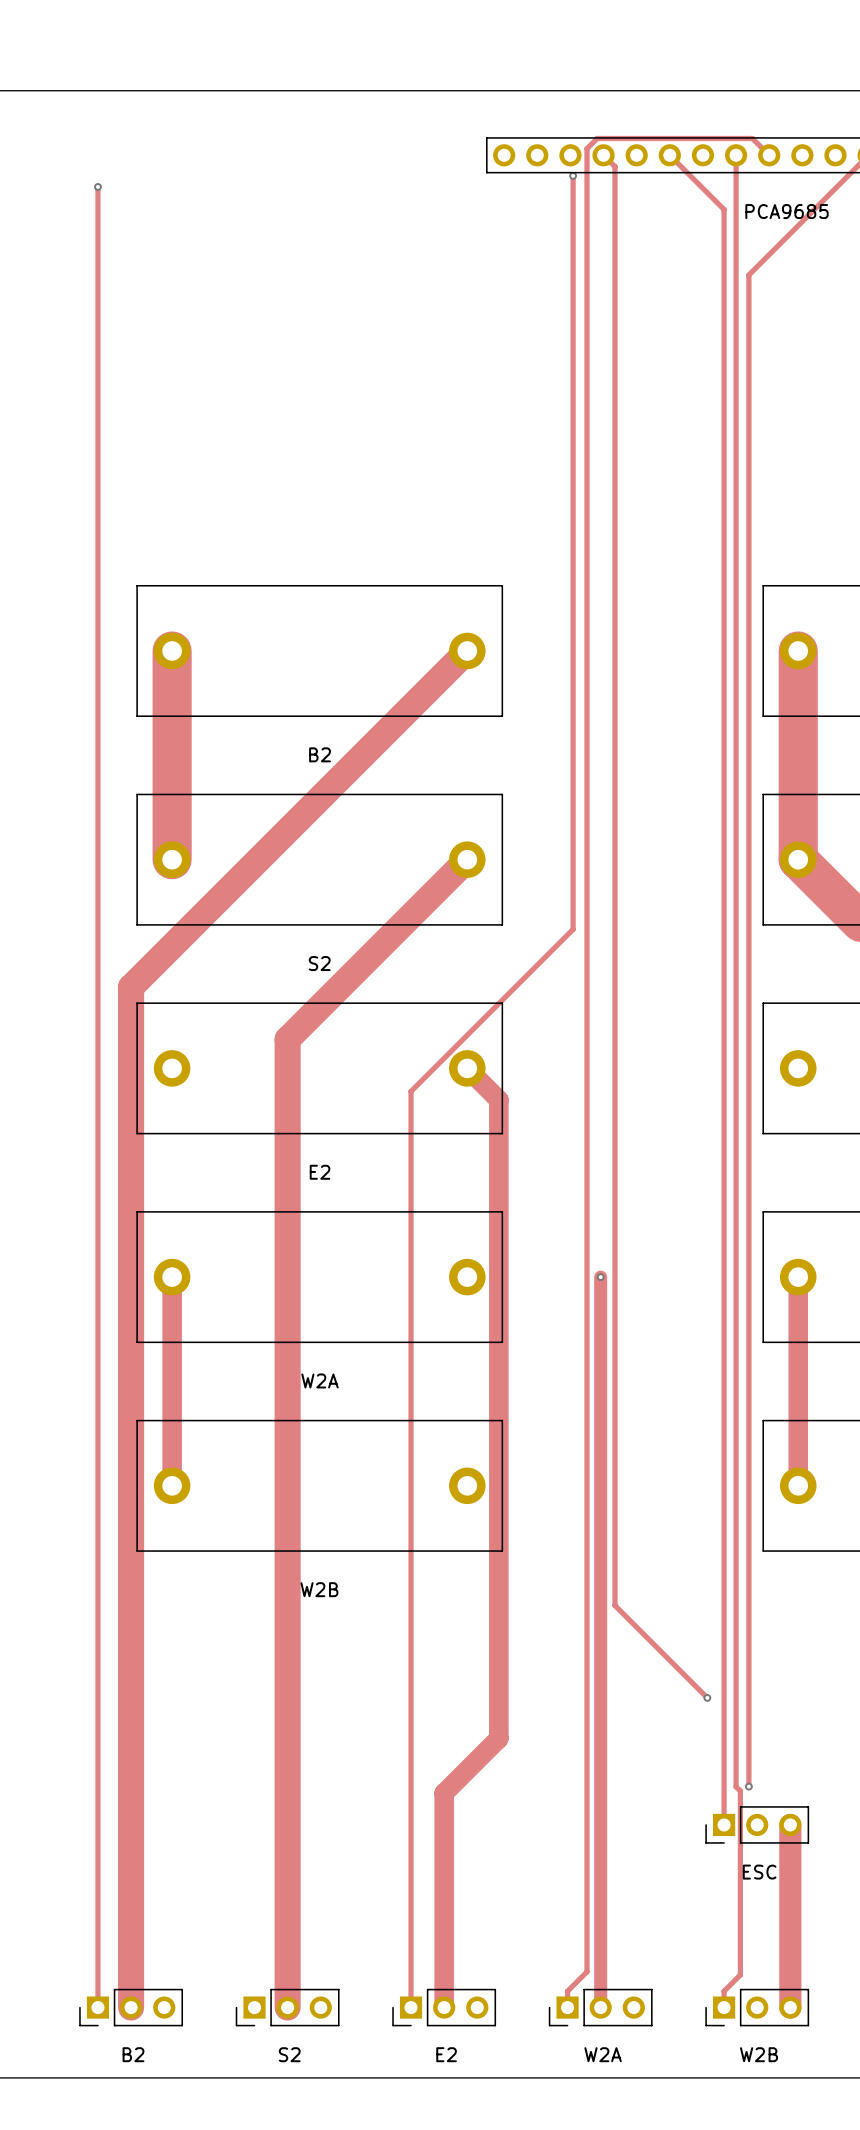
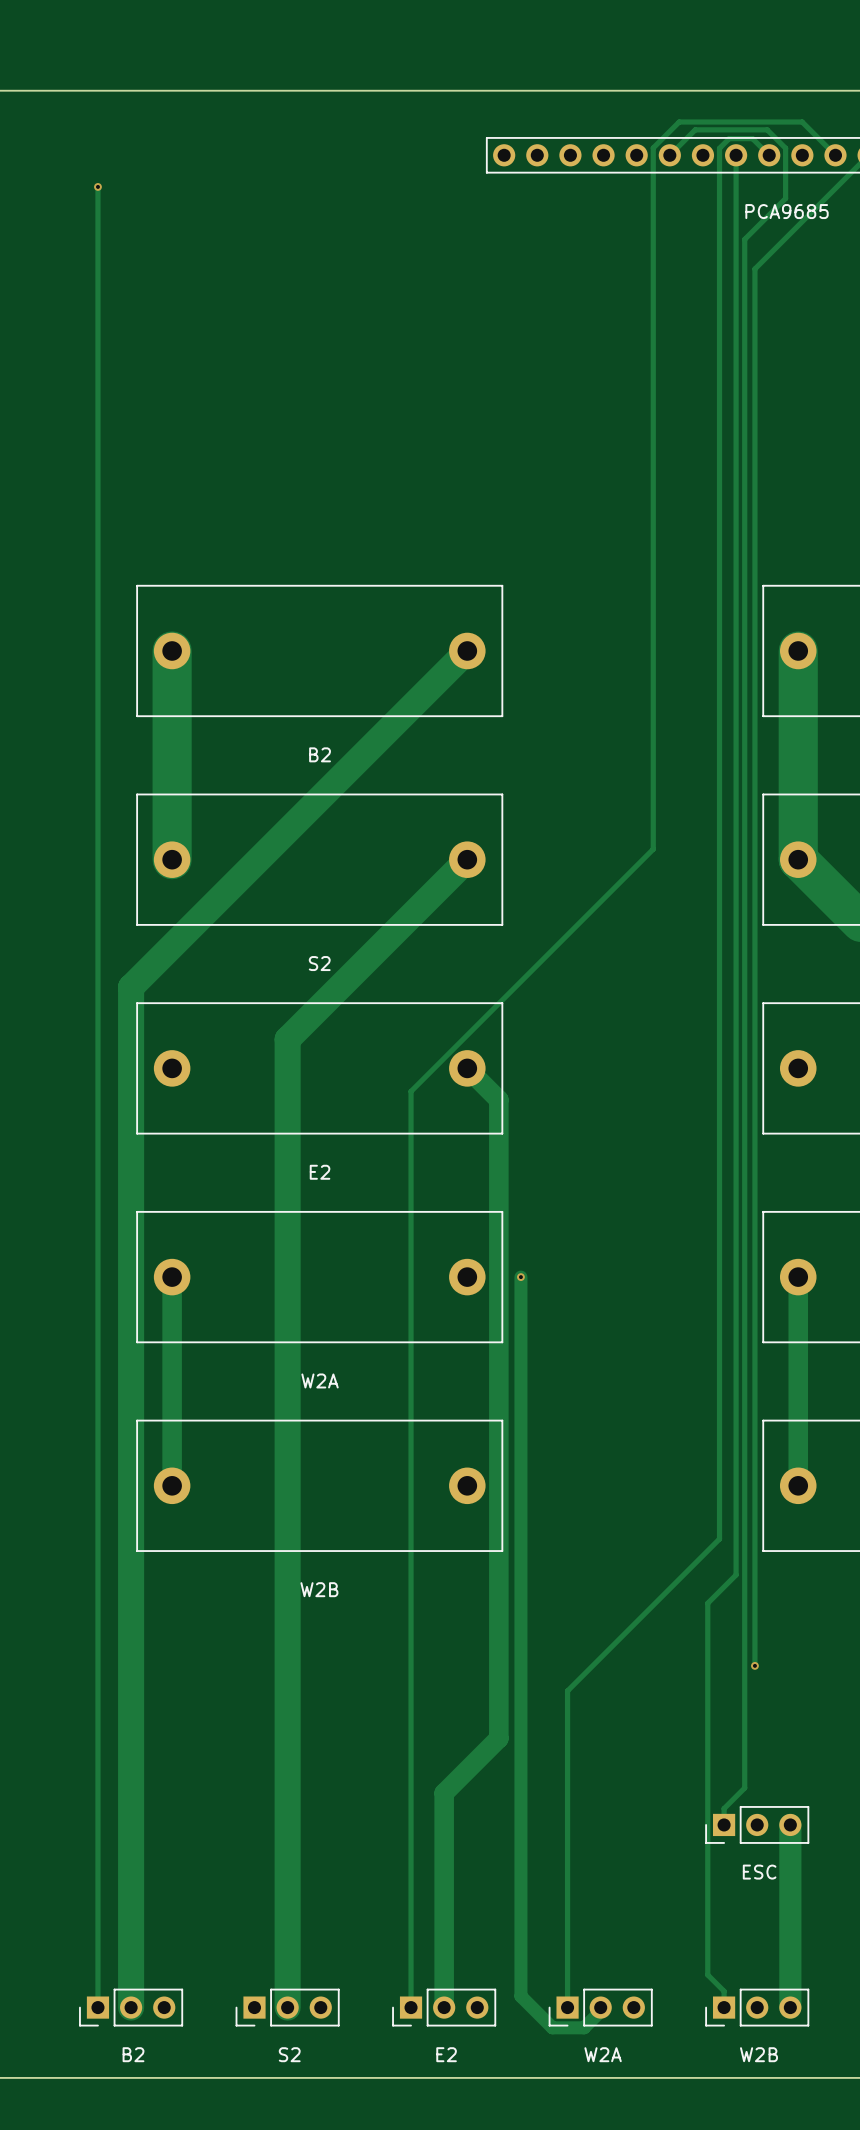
track: (752, 138) (597, 138) (587, 148) (587, 1971) (567, 1991) -> (752, 138) (729, 138) (719, 148) (719, 1539) (567, 1690) (567, 1991)
track: (603, 155) (615, 166) (615, 1605) (707, 1697) -> none
track: (669, 155) (724, 209) (724, 1808) -> (669, 155) (695, 129) (767, 129) (785, 148) (785, 198) (744, 239) (744, 1788) (724, 1808)
track: (573, 175) (573, 929) -> (835, 155) (802, 122) (679, 122) (653, 147) (653, 849) (573, 929)
via: (573, 175) -> none
track: (754, 268) (748, 275) (748, 1786) -> (754, 268) (754, 1665)
via: none -> (520, 1277)
track: (600, 1277) (600, 2007) -> (520, 1277) (520, 1996) (552, 2027) (584, 2027) (600, 2011) (600, 2007)
via: (600, 1277) -> none
track: (736, 1574) (736, 1786) (740, 1791) (740, 1974) (724, 1991) -> (736, 1574) (707, 1603) (707, 1974) (724, 1991)
via position: (707, 1697) -> (754, 1665)
via: (748, 1786) -> none

